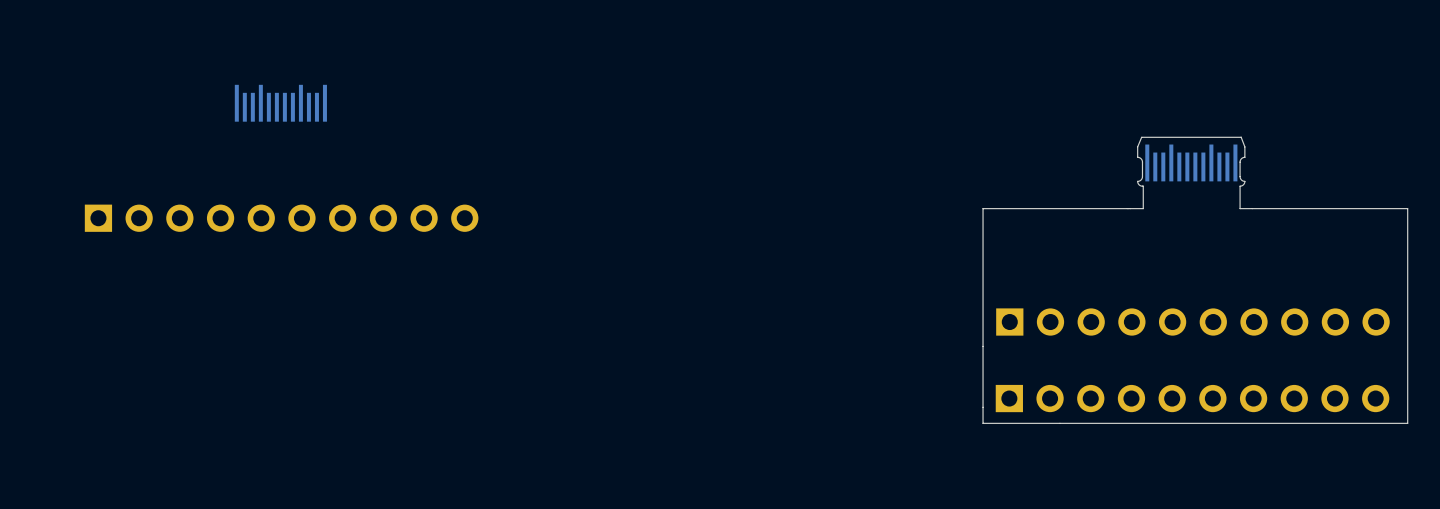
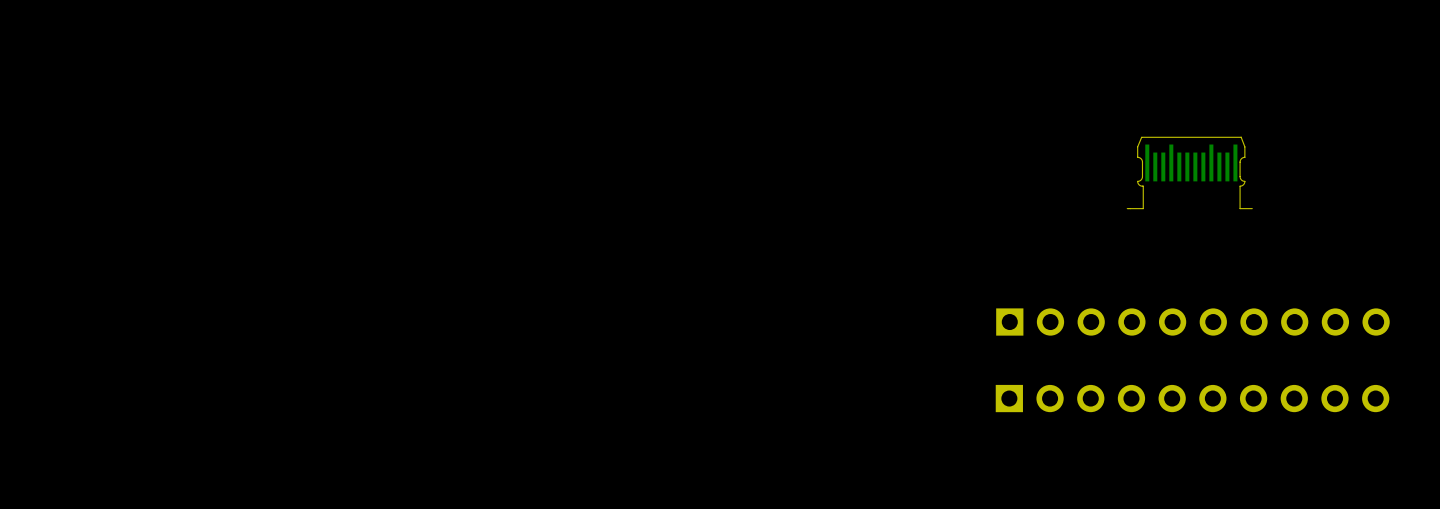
part: (280, 103) -> none
board edge: (1252, 208) (1407, 208) (1407, 423) (983, 423) (983, 208) (1127, 208) -> none
part: (281, 218) -> none

